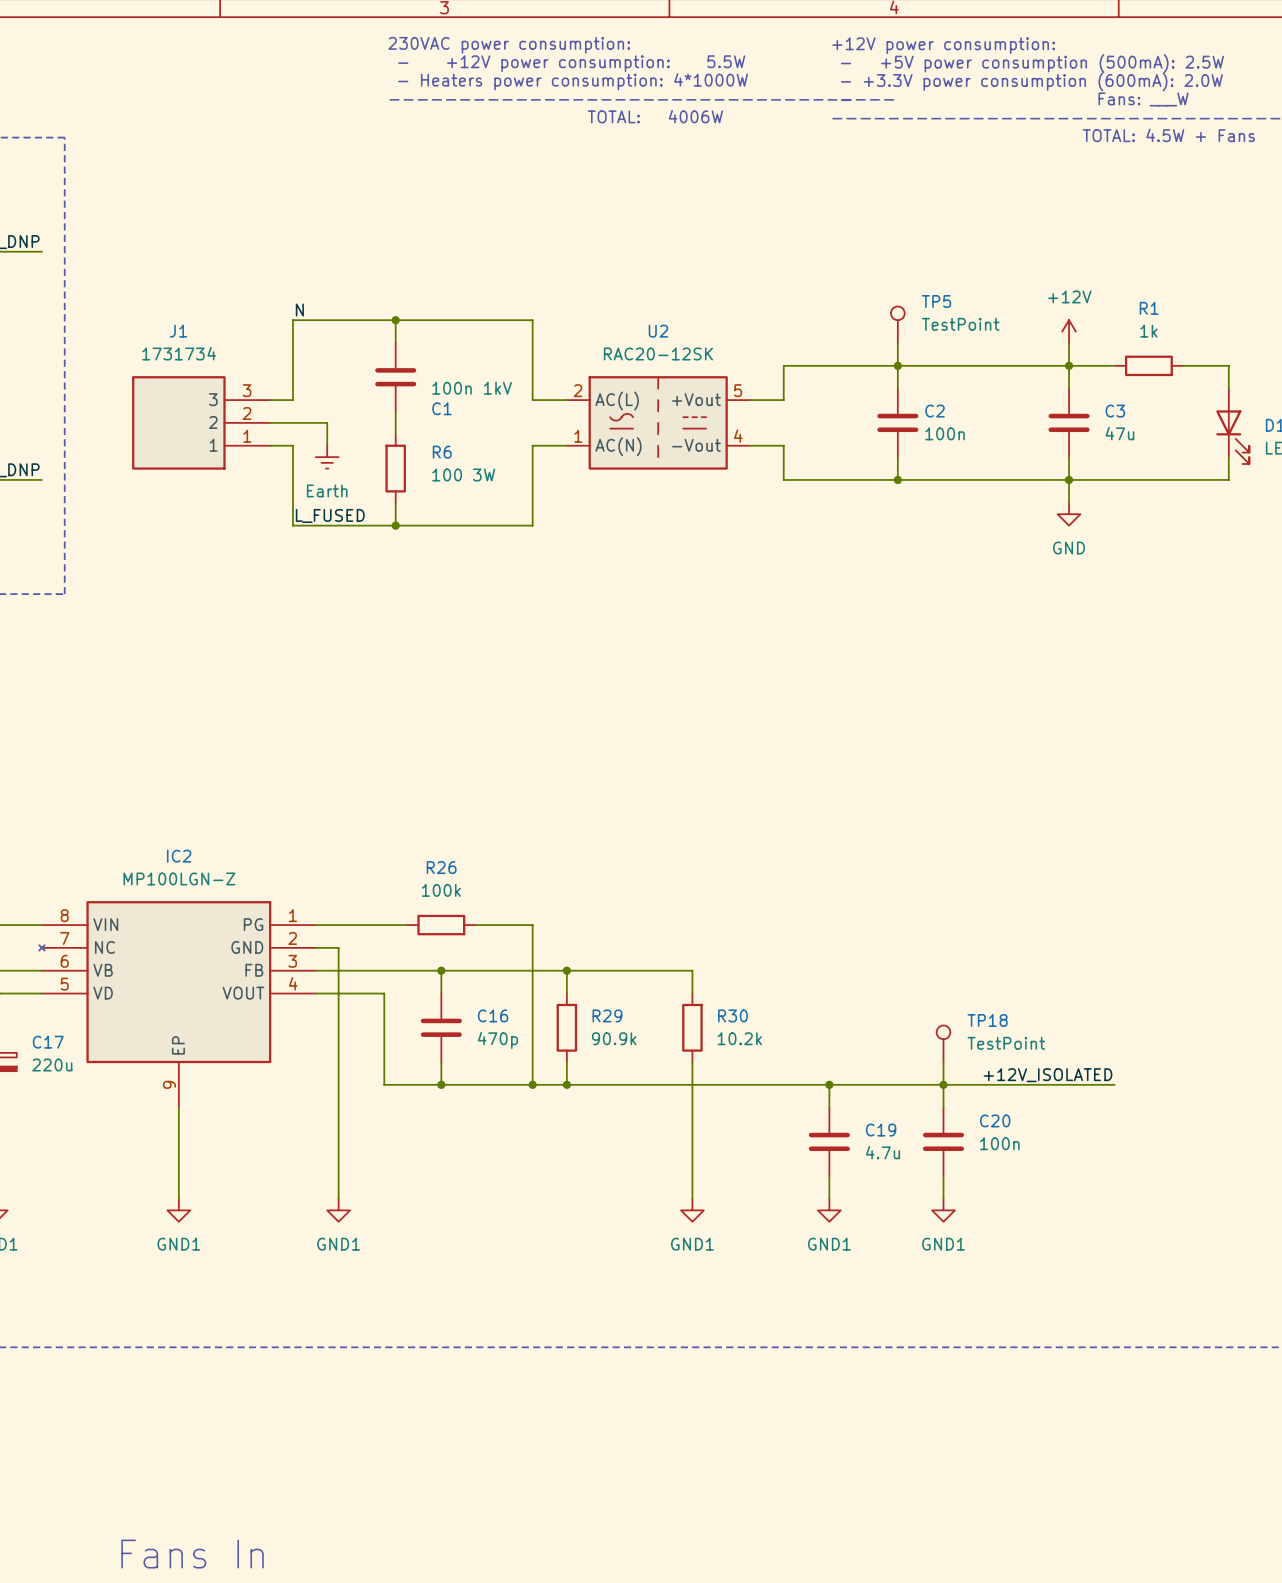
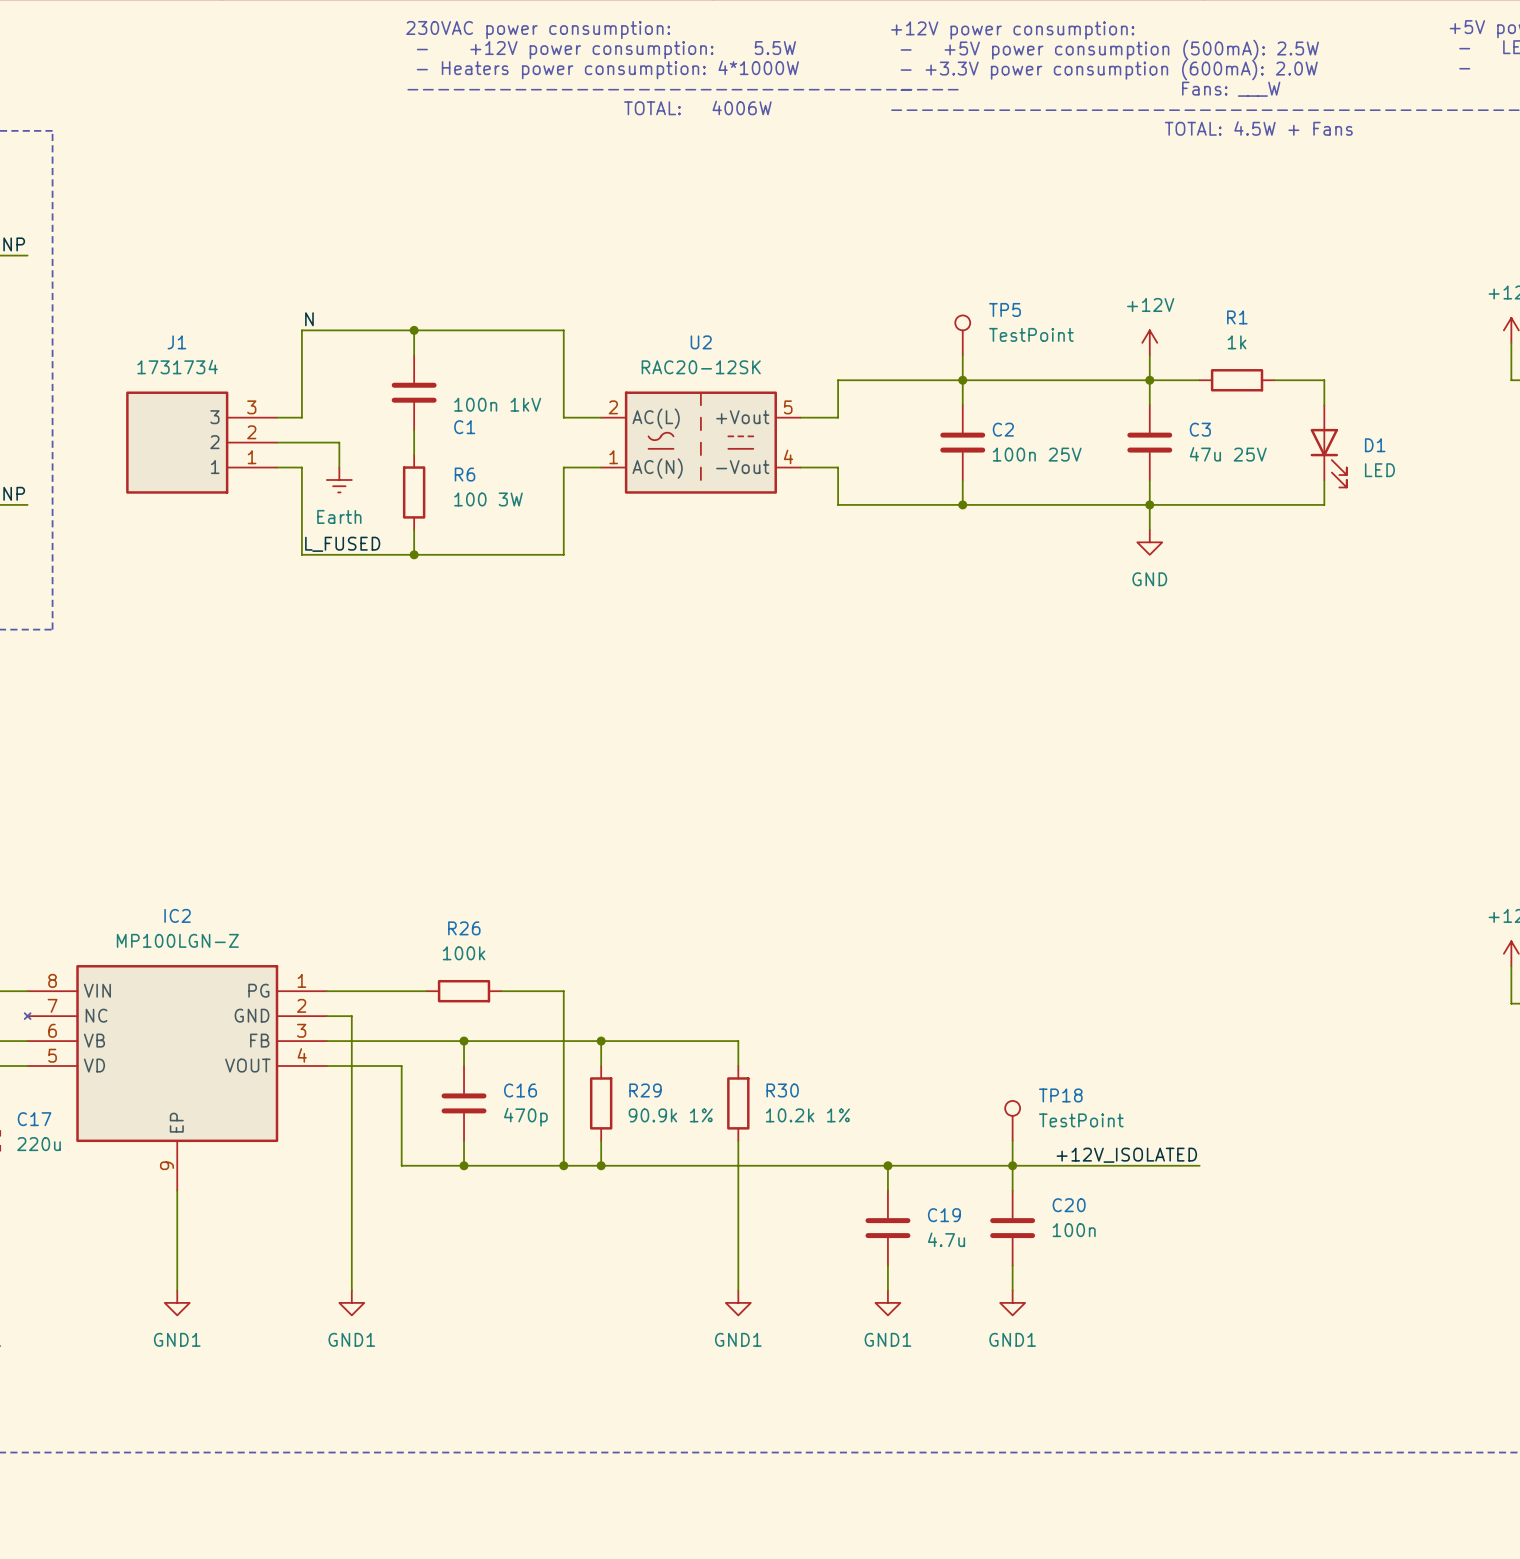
C2 value: 100n (945, 433) -> 100n 25V (1037, 454)
C3 value: 47u (1119, 433) -> 47u 25V (1228, 454)
R29 value: 90.9k (614, 1038) -> 90.9k 1% (670, 1115)
R30 value: 10.2k (739, 1038) -> 10.2k 1% (807, 1115)

